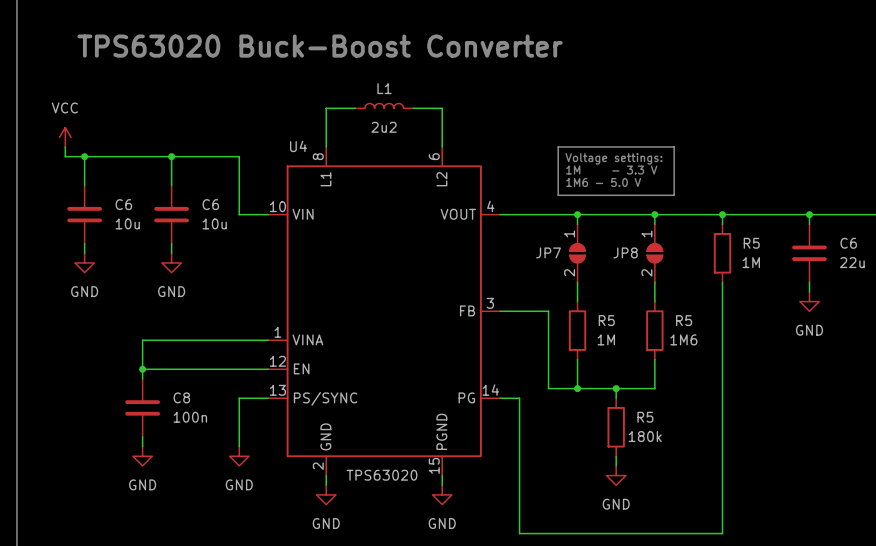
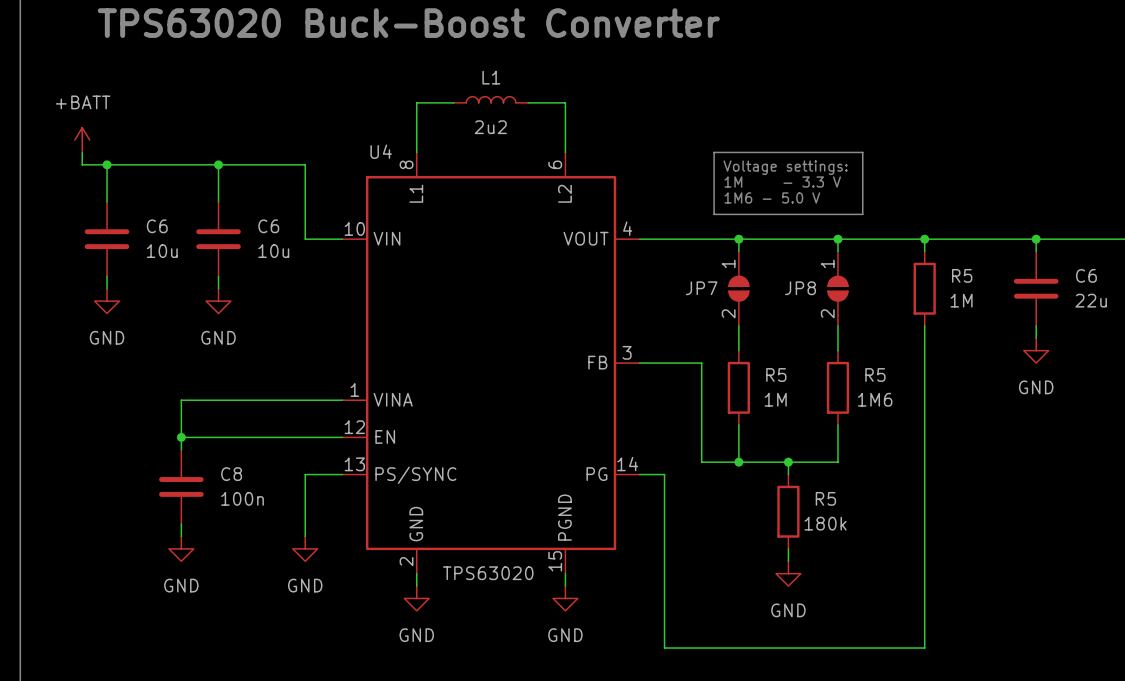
power symbol: VCC (65, 137) -> +BATT (82, 140)

